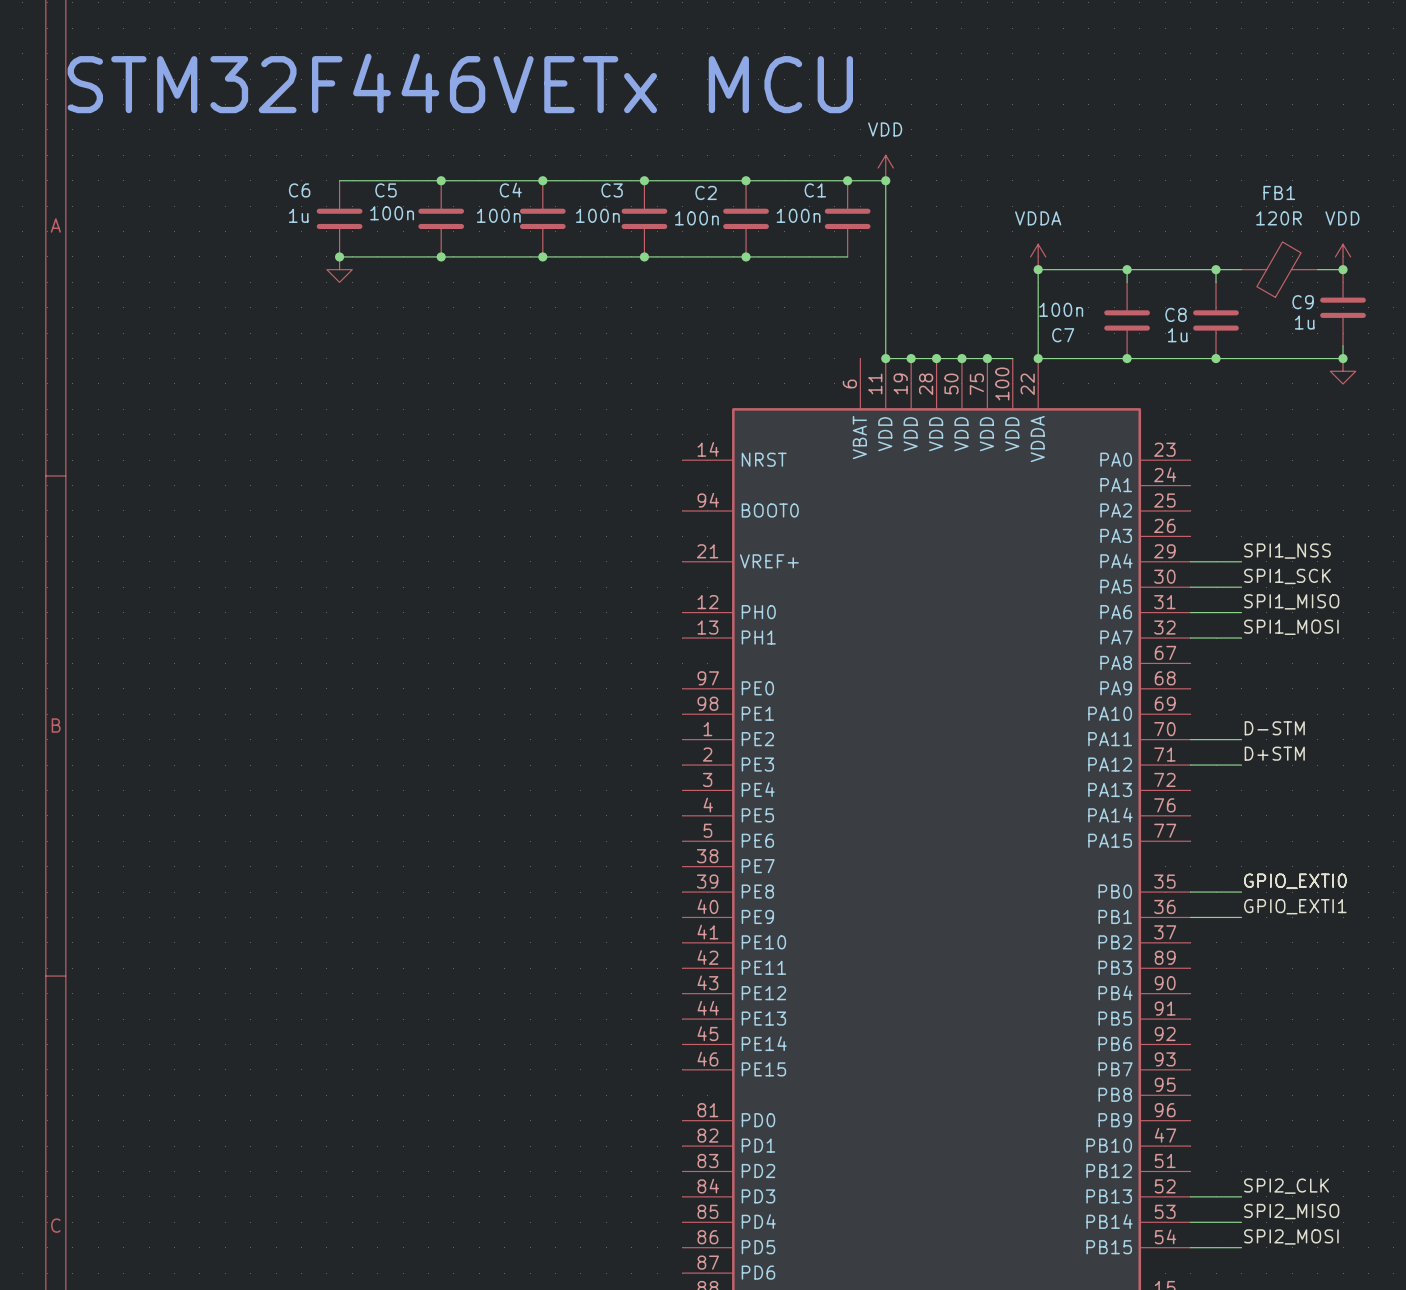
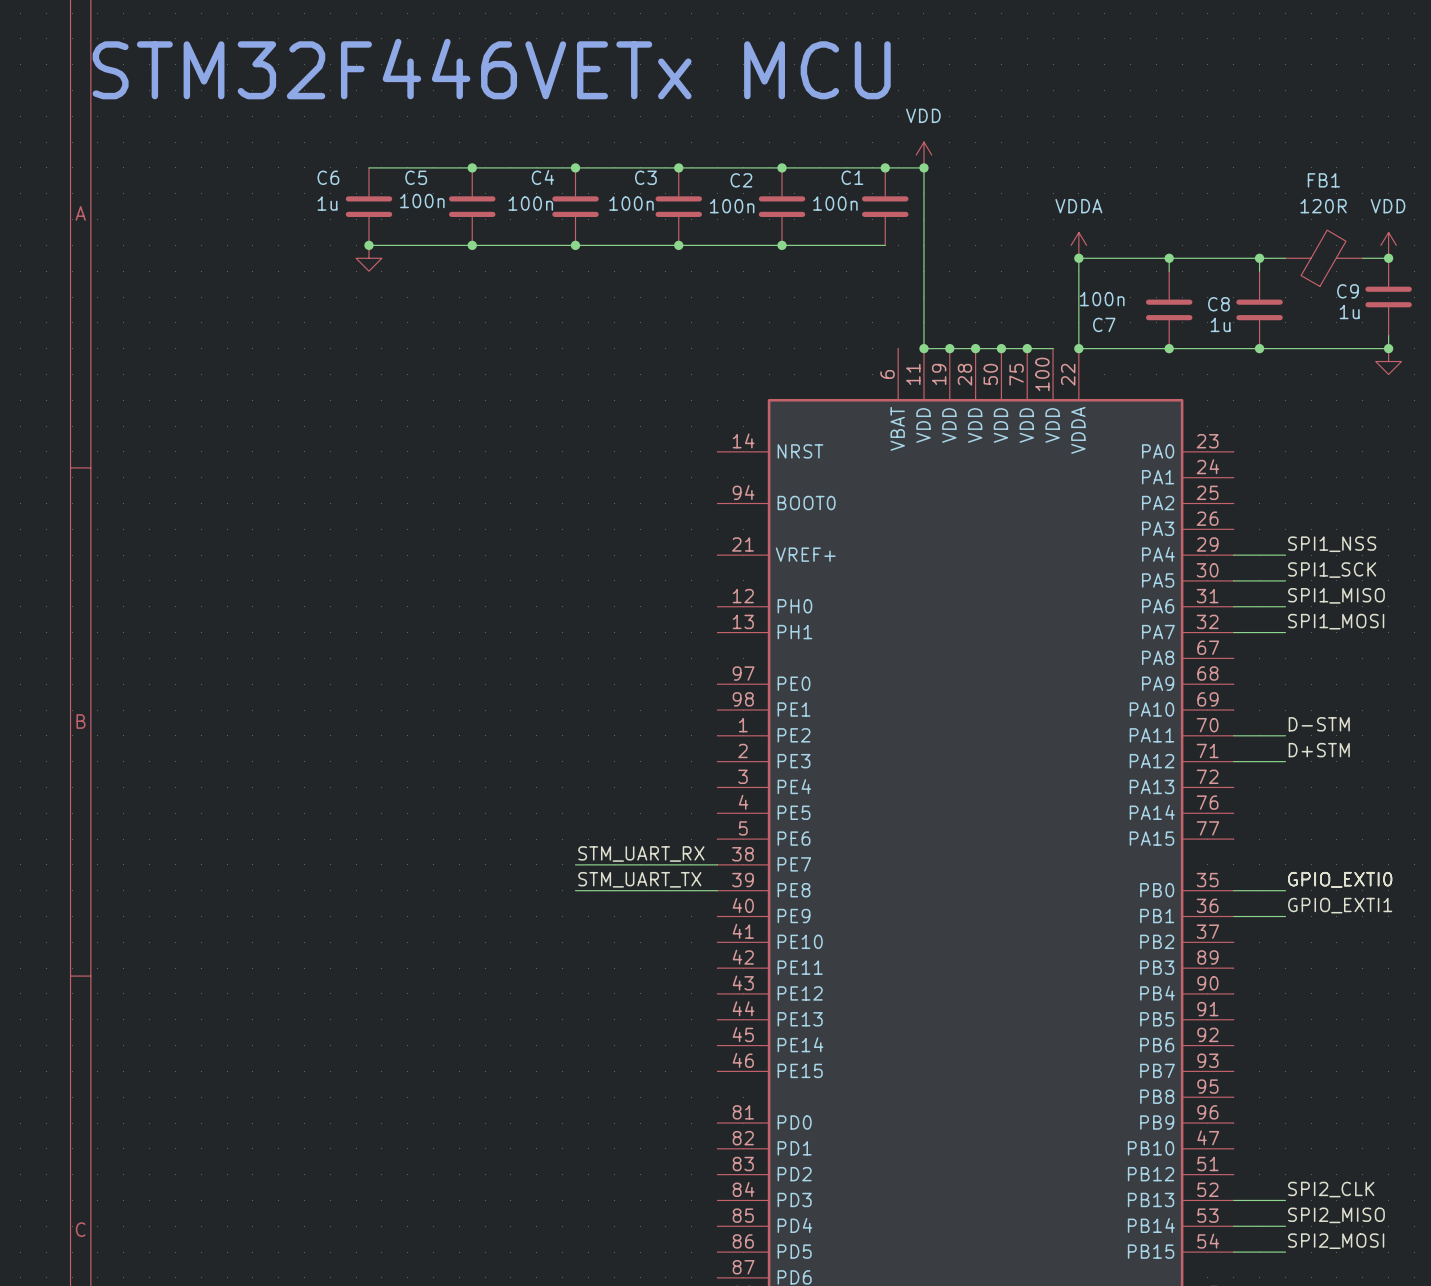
label: none -> STM_UART_RX (641, 853)
wire: none -> (575, 864) (717, 864)
label: none -> STM_UART_TX (639, 879)
wire: none -> (575, 890) (717, 890)

